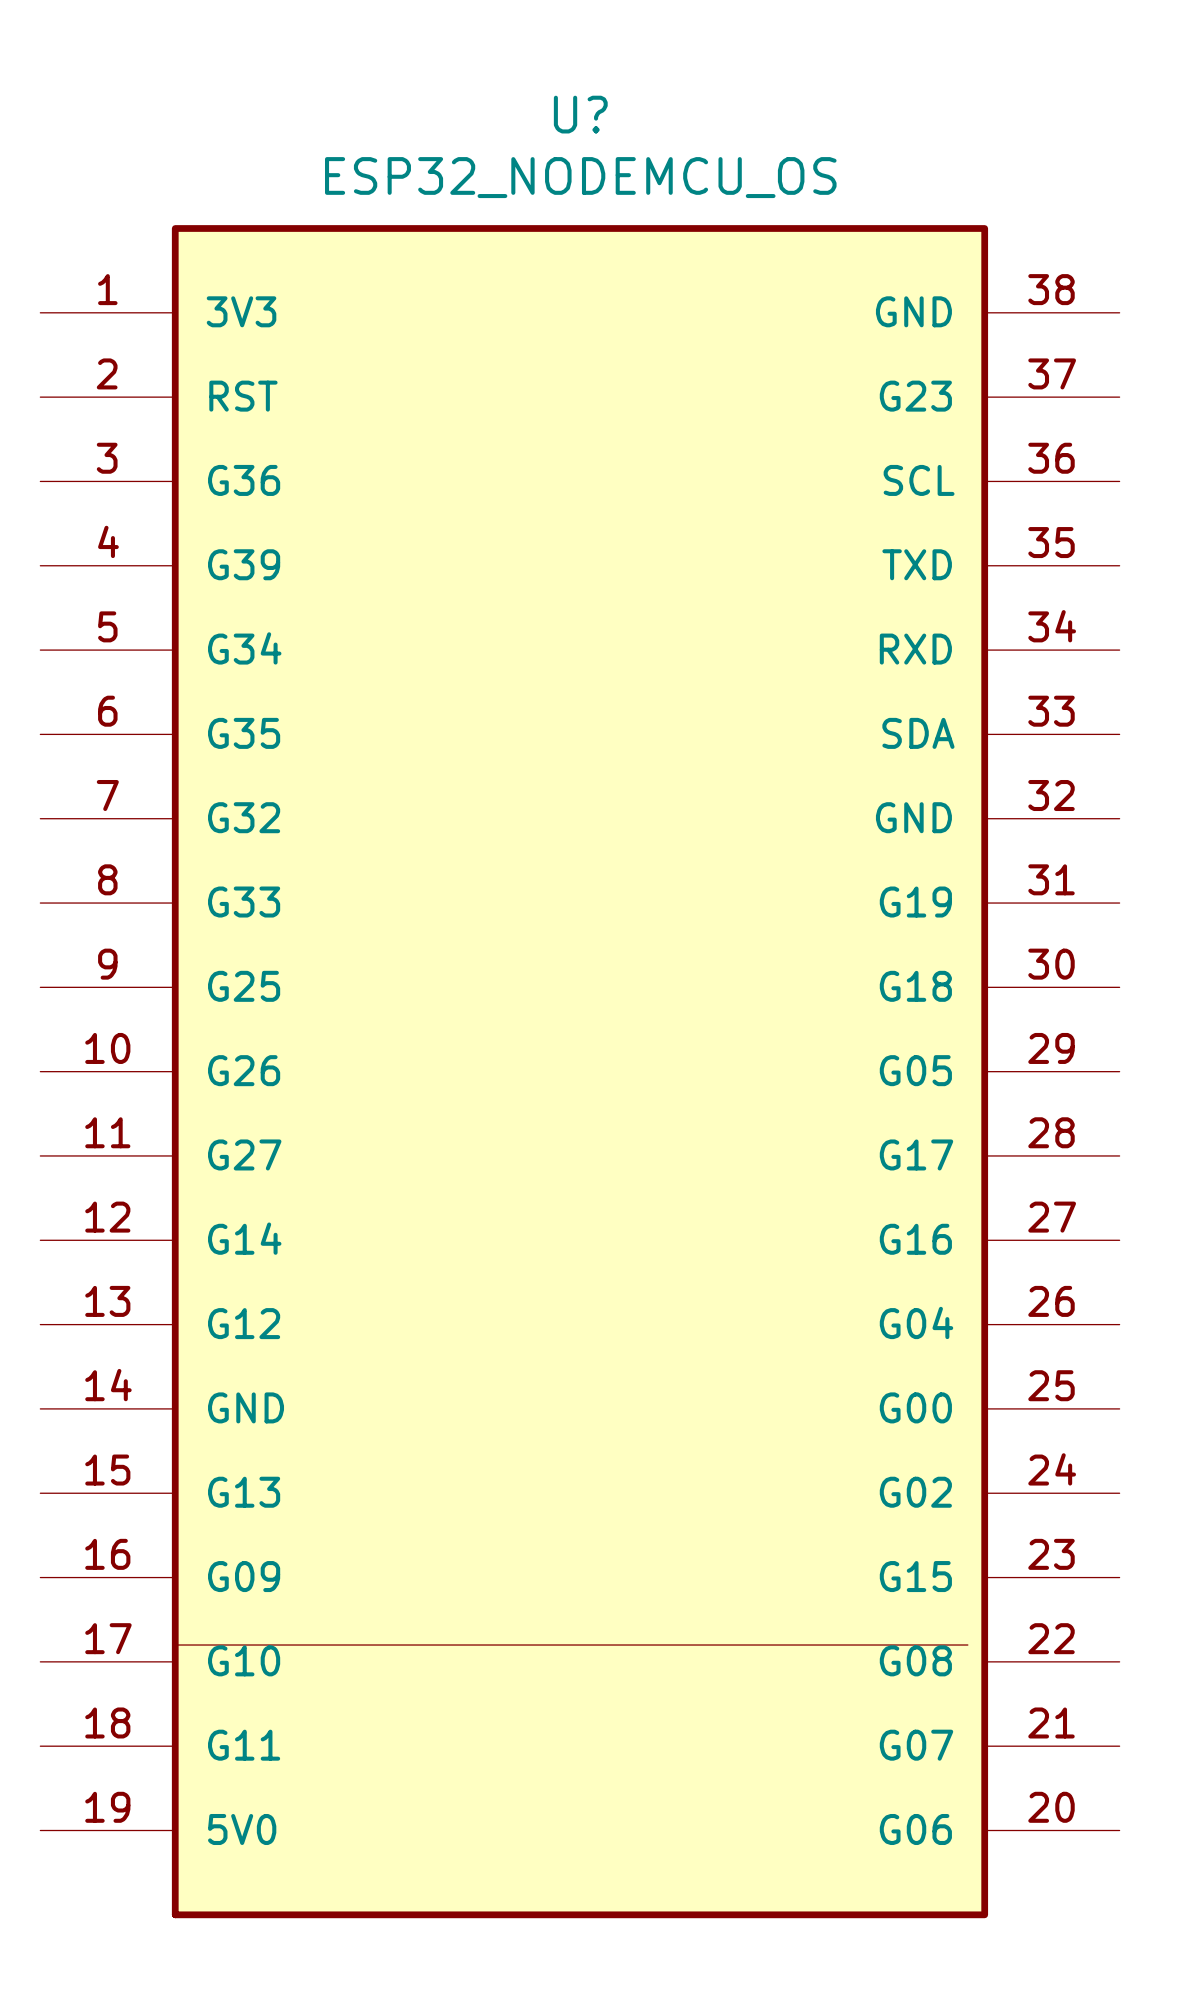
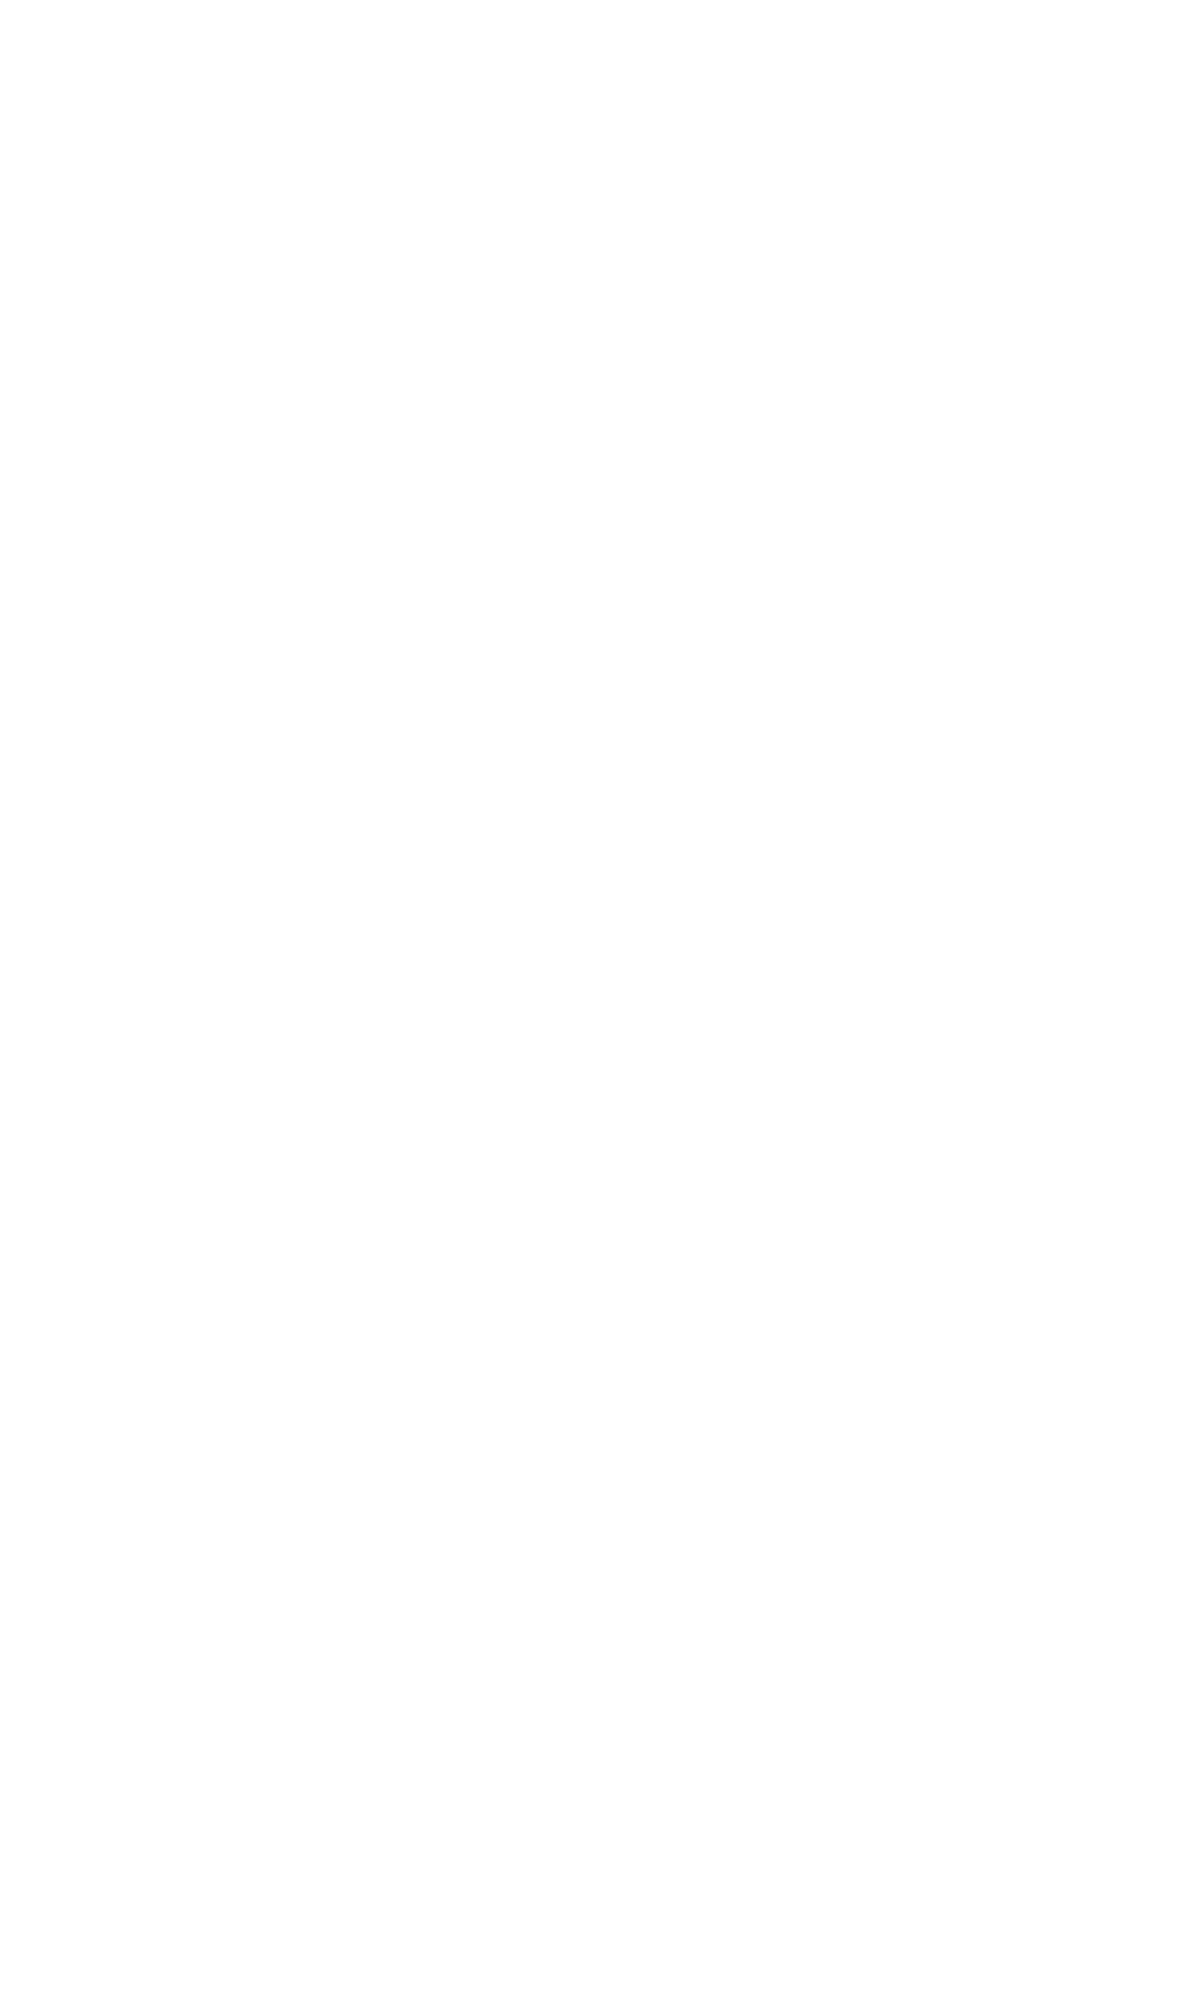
U?: ESP32_NODEMCU_OS (579, 1071) -> none

